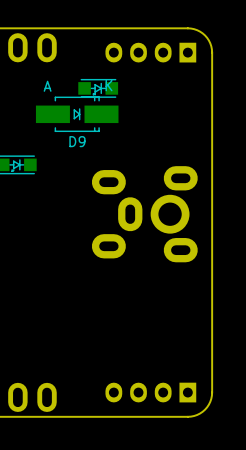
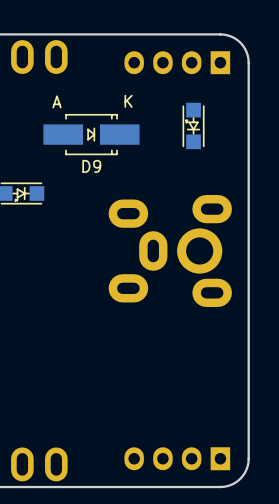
part rotation: 0° (98, 88) -> 90° clockwise (193, 125)
part position: (98, 88) -> (193, 125)

